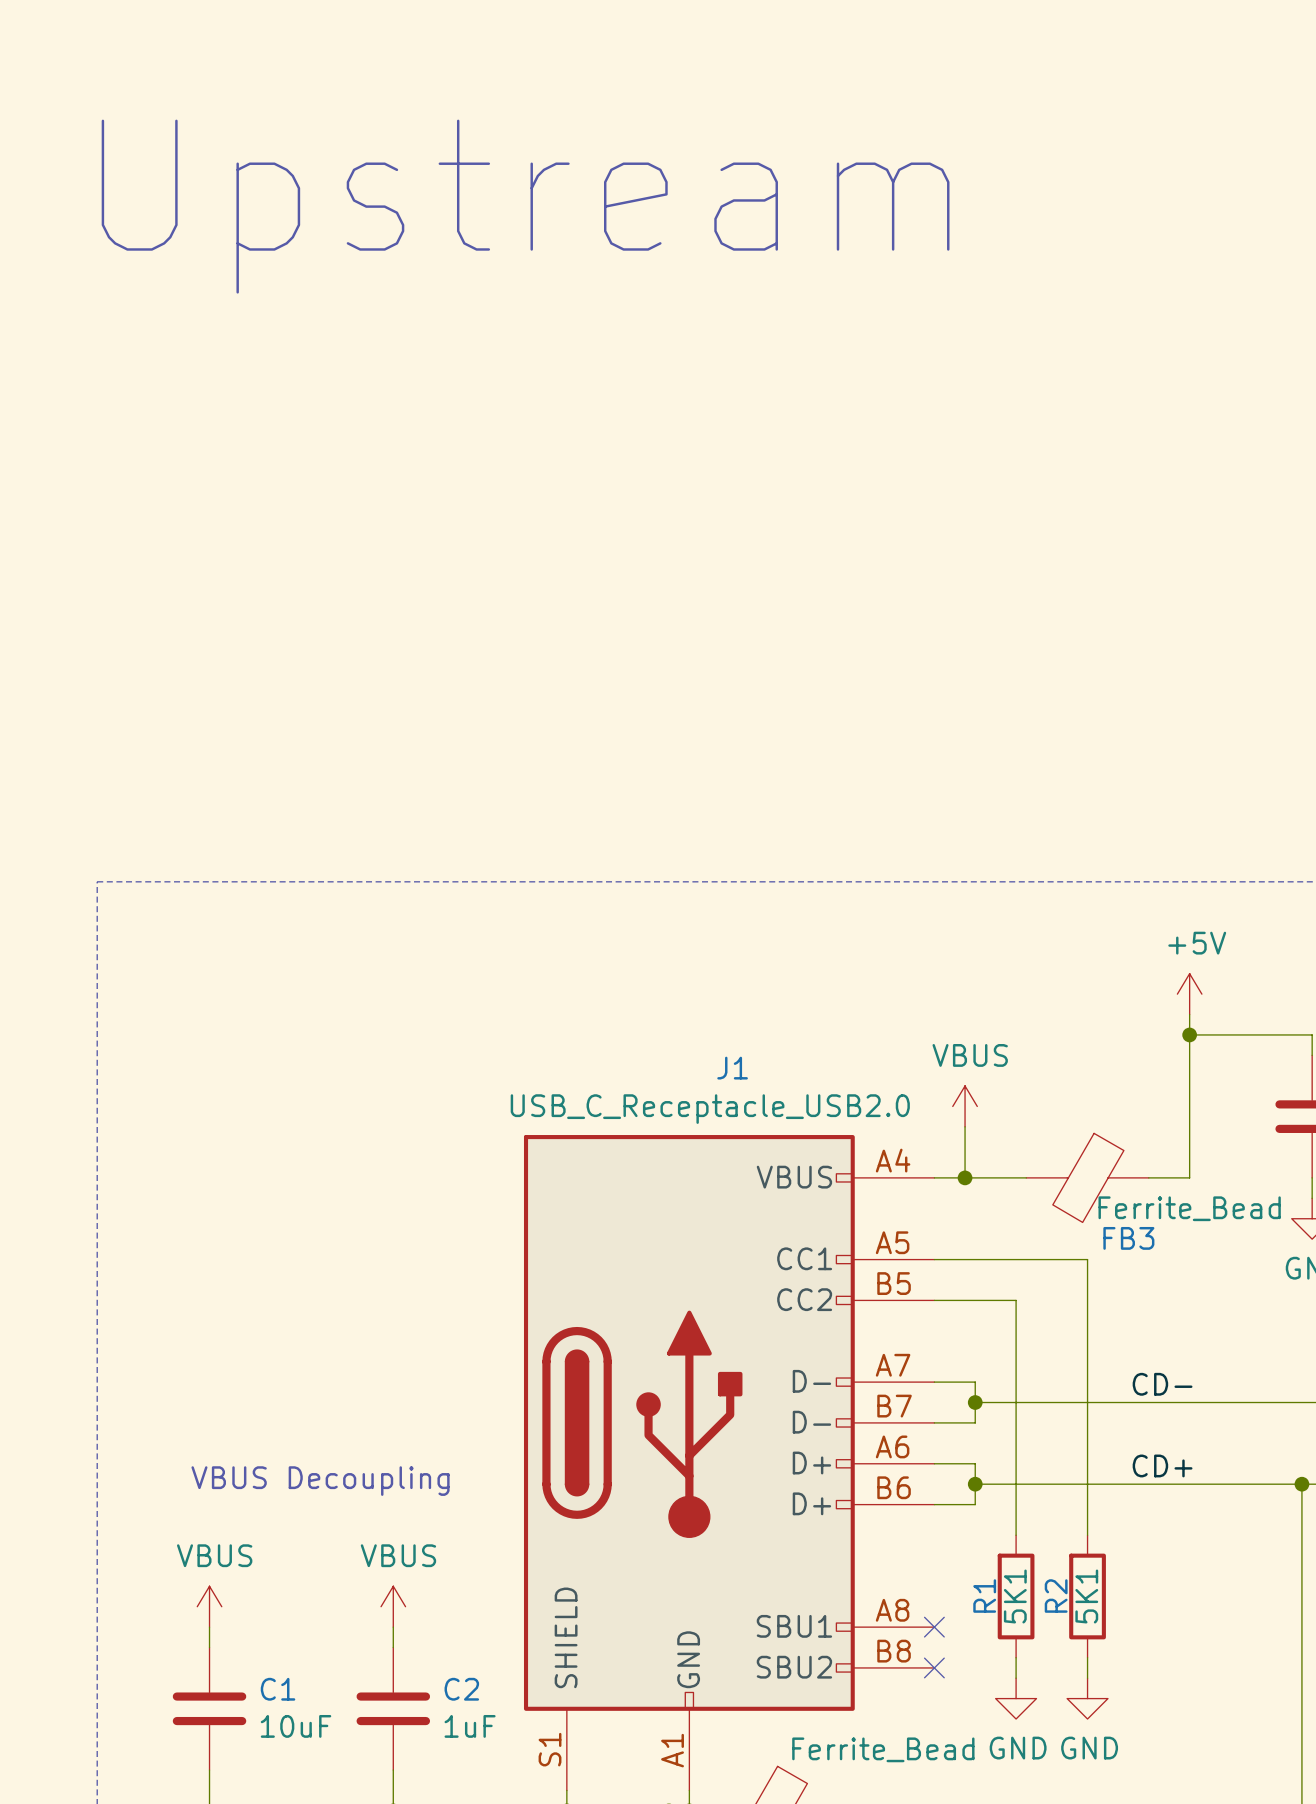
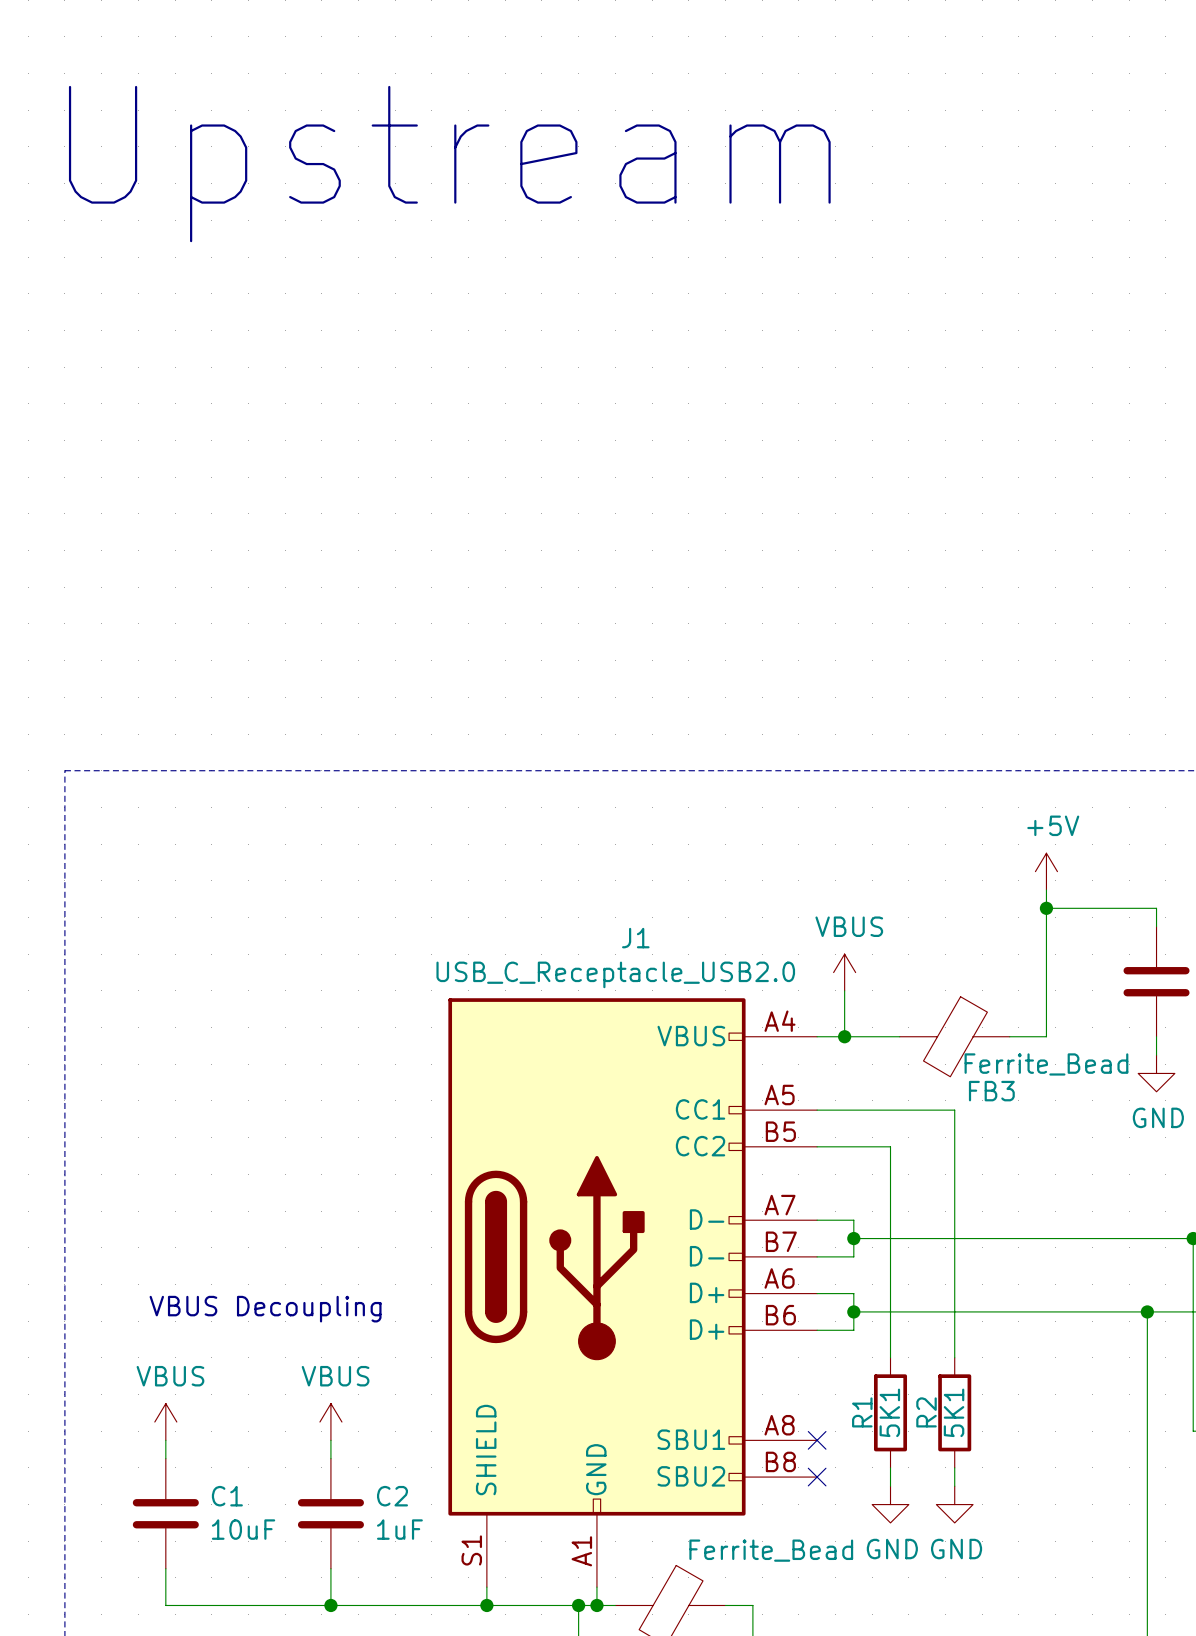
label: CD- (1162, 1384) -> none
label: CD+ (1162, 1465) -> none

